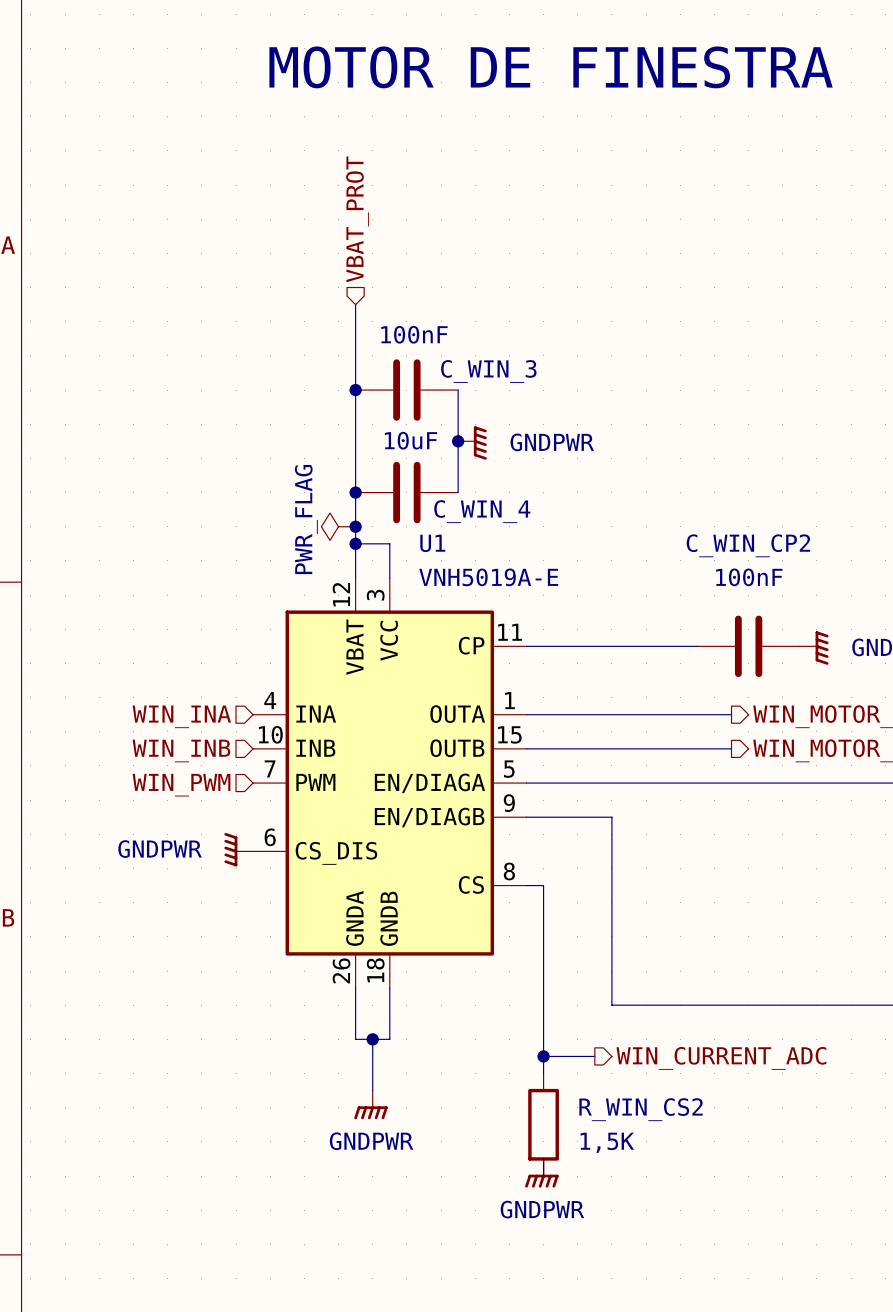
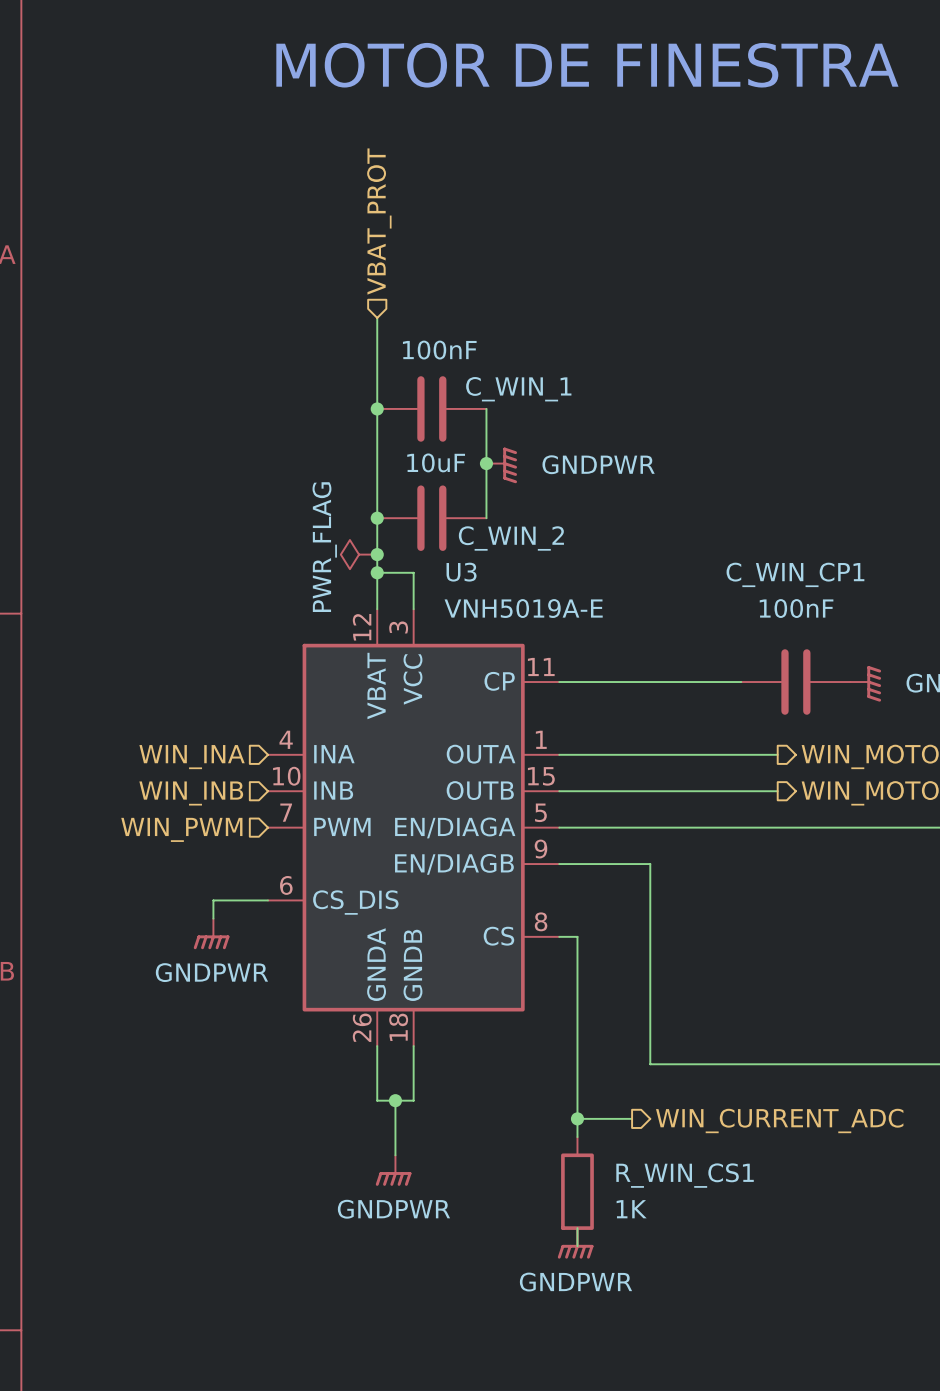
C_WIN_3 name: C_WIN_3 (488, 371) -> C_WIN_1 (518, 389)
C_WIN_4 name: C_WIN_4 (482, 511) -> C_WIN_2 (511, 538)
U1 name: U1 (432, 543) -> U3 (461, 572)
C_WIN_CP2 name: C_WIN_CP2 (748, 545) -> C_WIN_CP1 (795, 574)
power symbol text position: GNDPWR (160, 849) -> GNDPWR (211, 972)
power symbol rotation: 0° (238, 849) -> 90° counterclockwise (211, 933)
power symbol position: GNDPWR (238, 849) -> GNDPWR (211, 933)
wire: none -> (268, 900) (213, 900) (213, 918)
R_WIN_CS2 name: R_WIN_CS2 (641, 1109) -> R_WIN_CS1 (685, 1175)
R_WIN_CS2 value: 1,5K (607, 1142) -> 1K (631, 1209)

